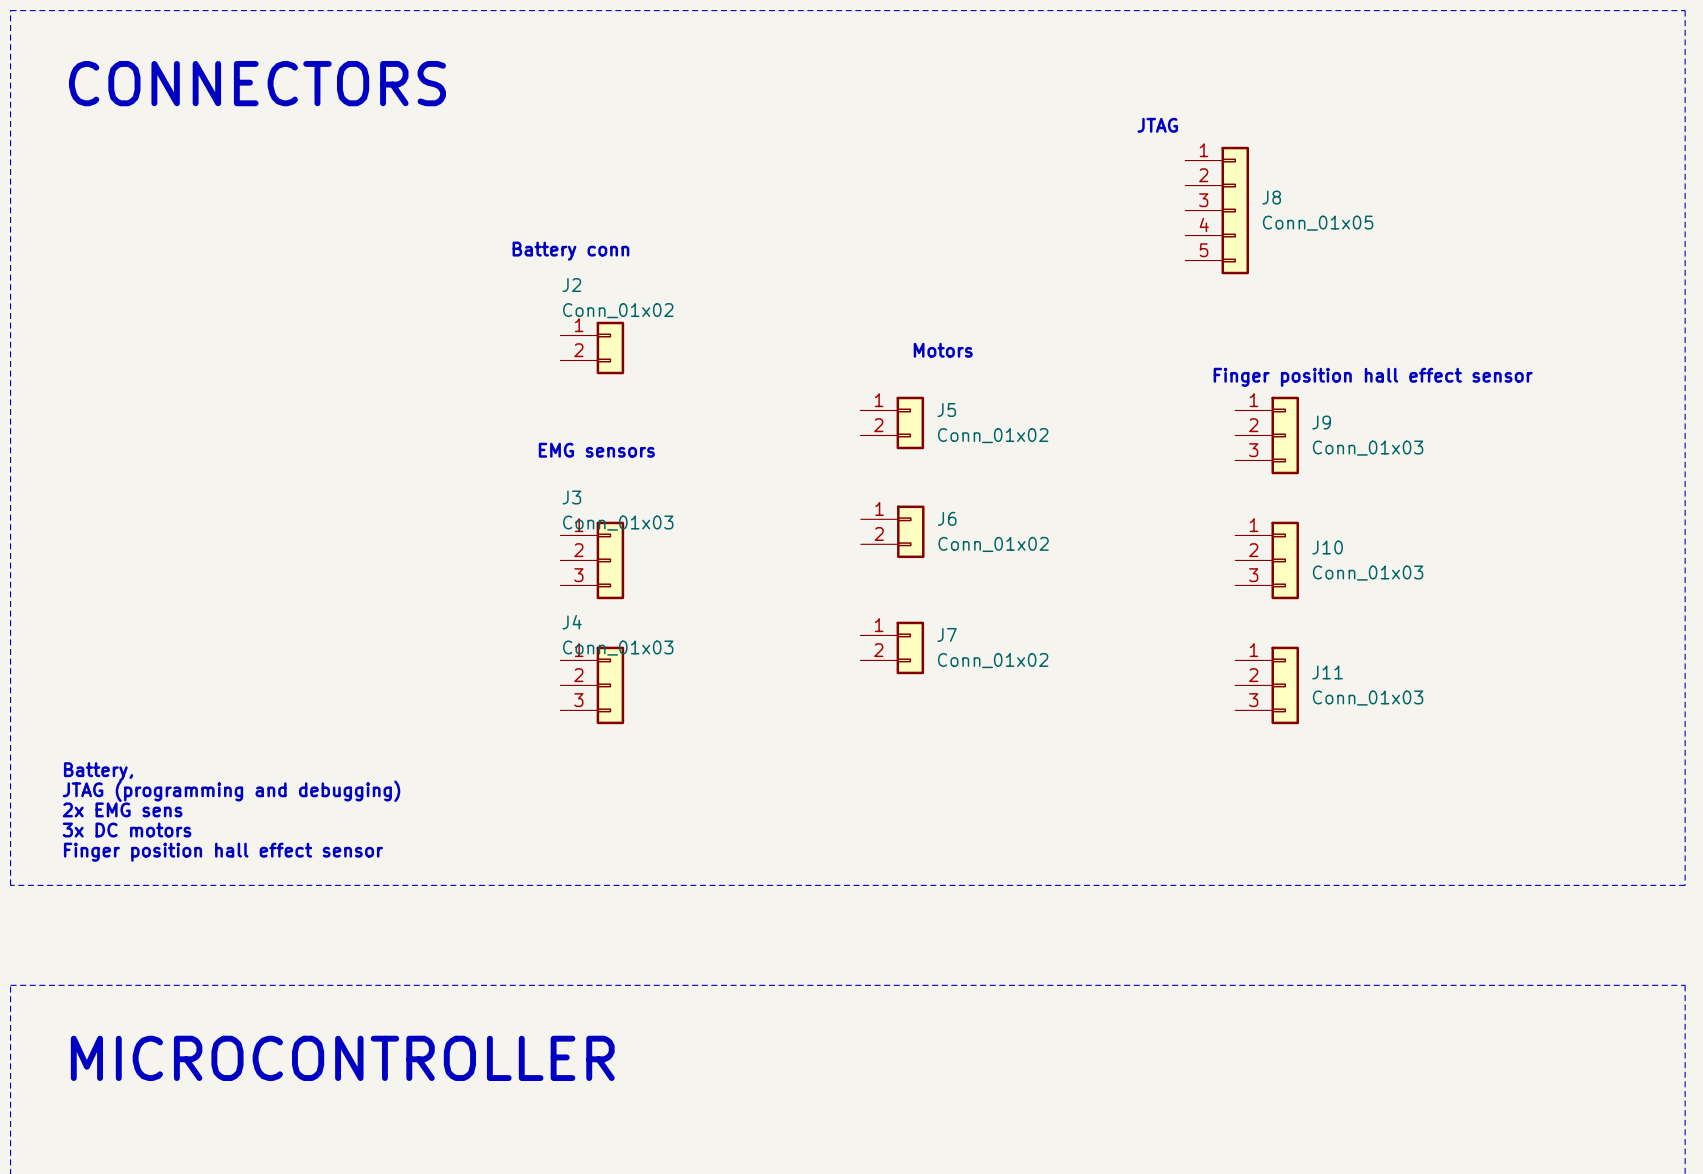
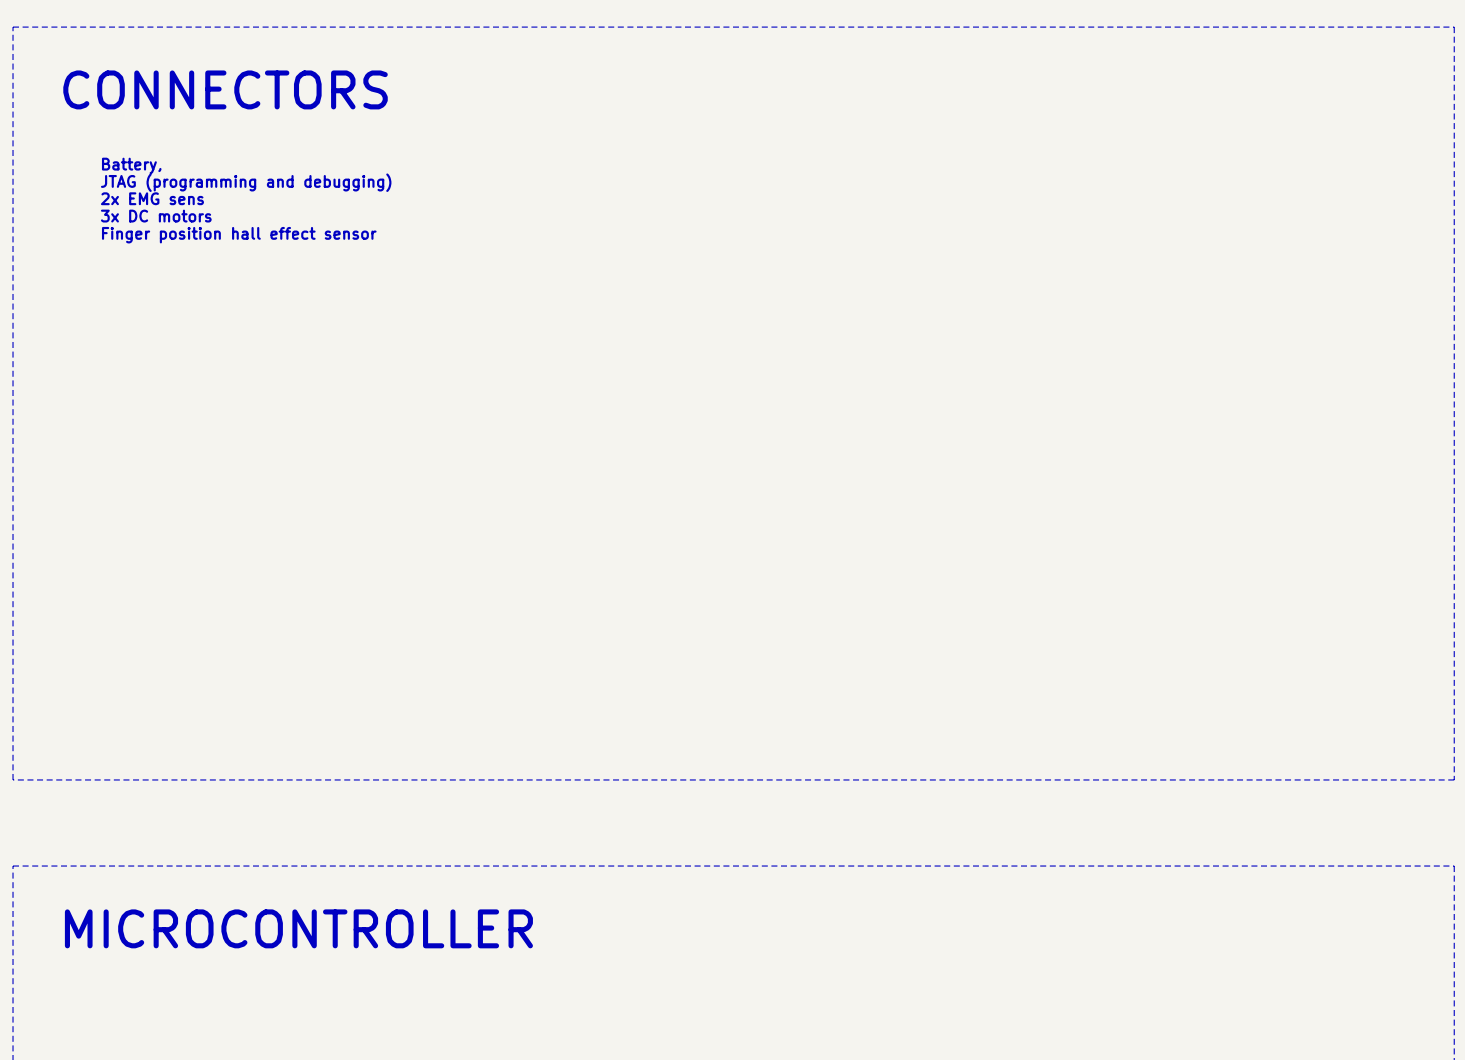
text: JTAG (1157, 125) -> none
text: none -> Battery, (131, 165)
text: none -> JTAG (programming and debugging) (246, 182)
text: none -> 2x EMG sens (152, 198)
J8: Conn_01x05 (1217, 210) -> none
text: none -> 3x DC motors (156, 216)
text: Battery conn (570, 251) -> none
text: none -> Finger position hall effect sensor (239, 235)
J2: Conn_01x02 (592, 348) -> none
text: Motors (943, 350) -> none
text: Finger position hall effect sensor (1373, 377) -> none
J5: Conn_01x02 (892, 422) -> none
J9: Conn_01x03 (1267, 435) -> none
text: EMG sensors (596, 450) -> none
J6: Conn_01x02 (892, 531) -> none
J3: Conn_01x03 (592, 560) -> none
J10: Conn_01x03 (1267, 560) -> none
J7: Conn_01x02 (892, 647) -> none
J4: Conn_01x03 (592, 685) -> none
J11: Conn_01x03 (1267, 685) -> none
text: Battery, (98, 771) -> none
text: JTAG (programming and debugging) (231, 791) -> none
text: 2x EMG sens (122, 809) -> none
text: 3x DC motors (127, 830) -> none
text: Finger position hall effect sensor (223, 852) -> none

